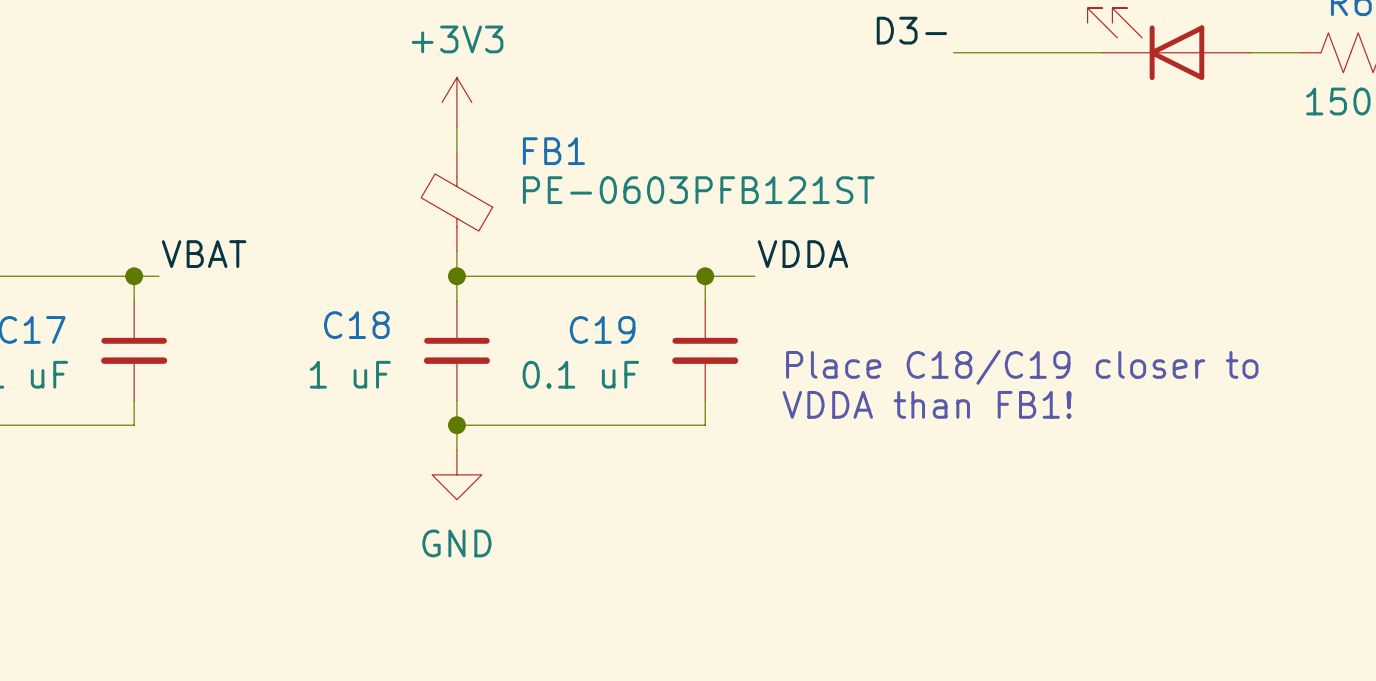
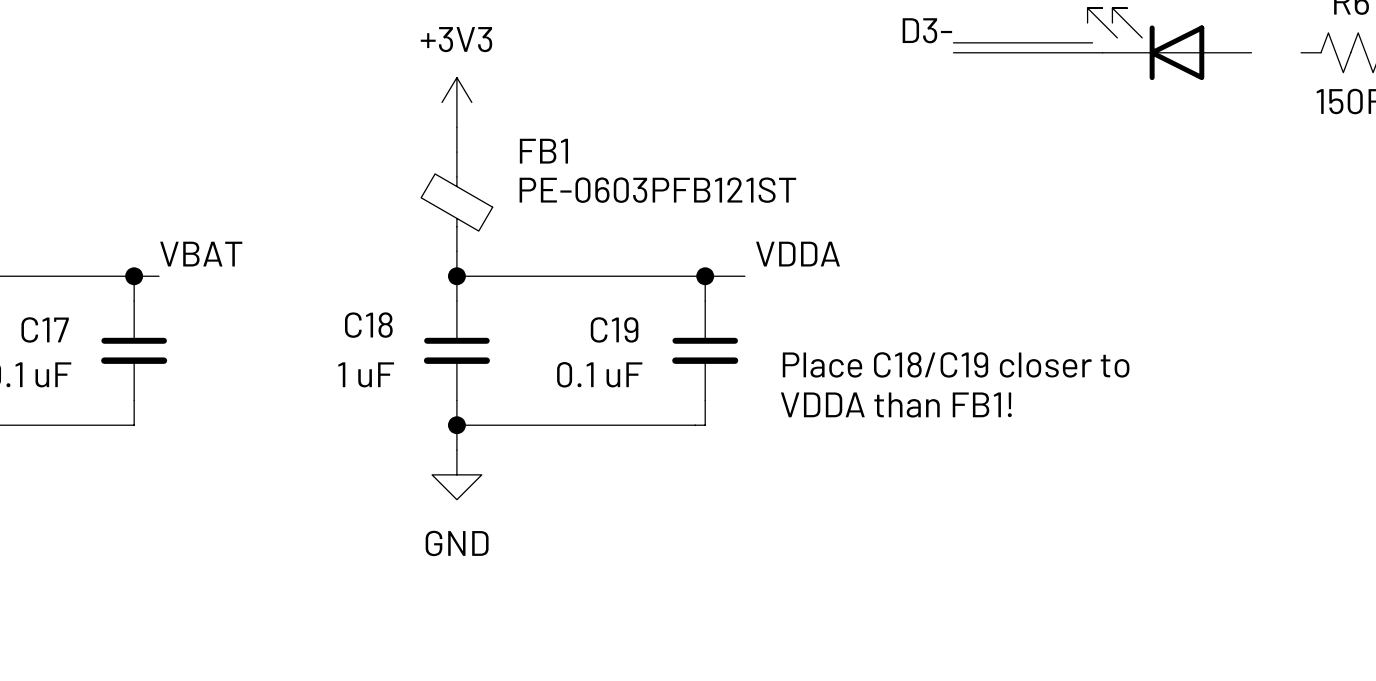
wire: none -> (953, 42) (1092, 42)
wire: (1251, 52) (1301, 52) -> none
wire: (744, 276) (754, 276) -> none

